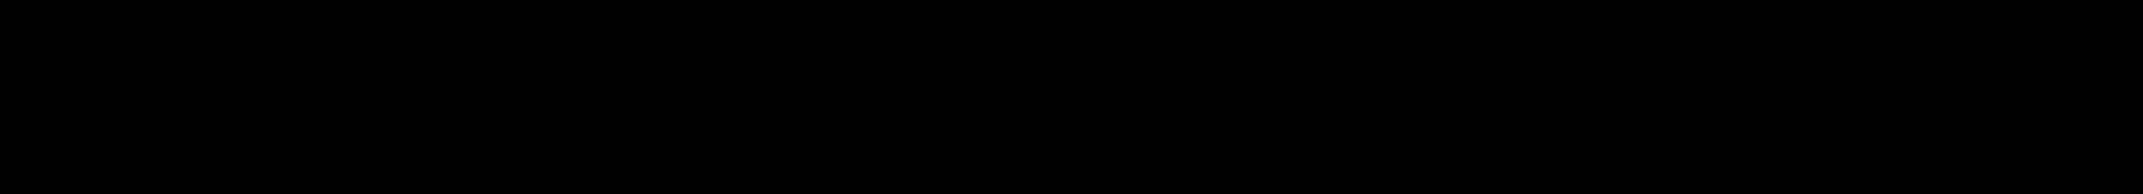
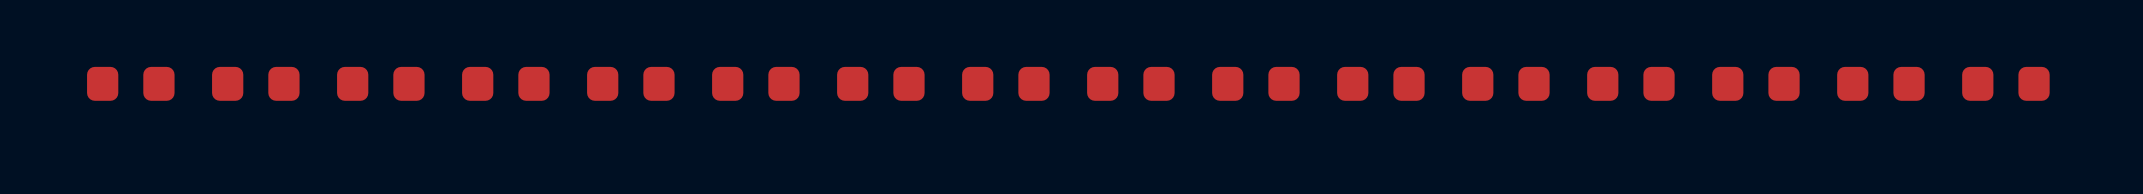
part: none -> (130, 83)
part: none -> (255, 83)
part: none -> (380, 83)
part: none -> (505, 83)
part: none -> (630, 83)
part: none -> (755, 83)
part: none -> (880, 83)
part: none -> (1005, 83)
part: none -> (1130, 83)
part: none -> (1255, 83)
part: none -> (1380, 83)
part: none -> (1505, 83)
part: none -> (1630, 83)
part: none -> (1755, 83)
part: none -> (1880, 83)
part: none -> (2005, 83)

